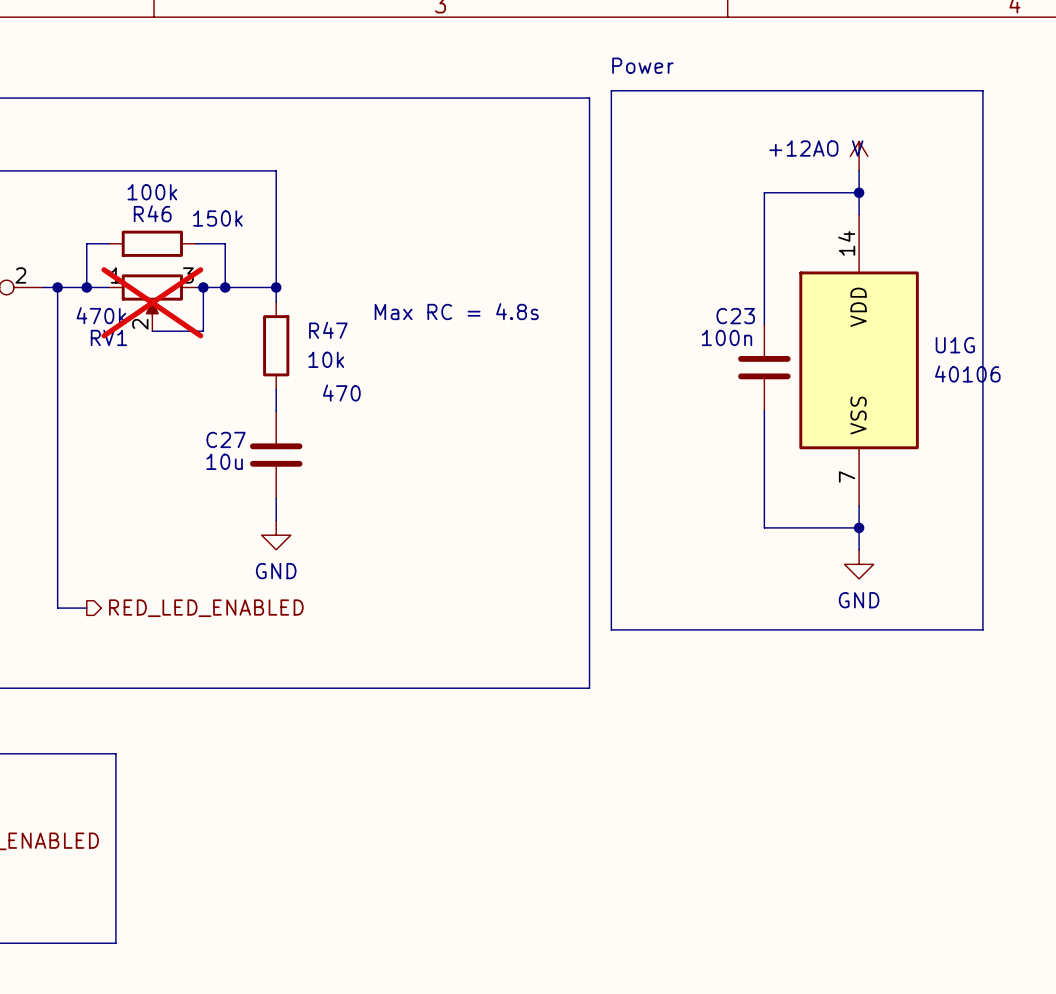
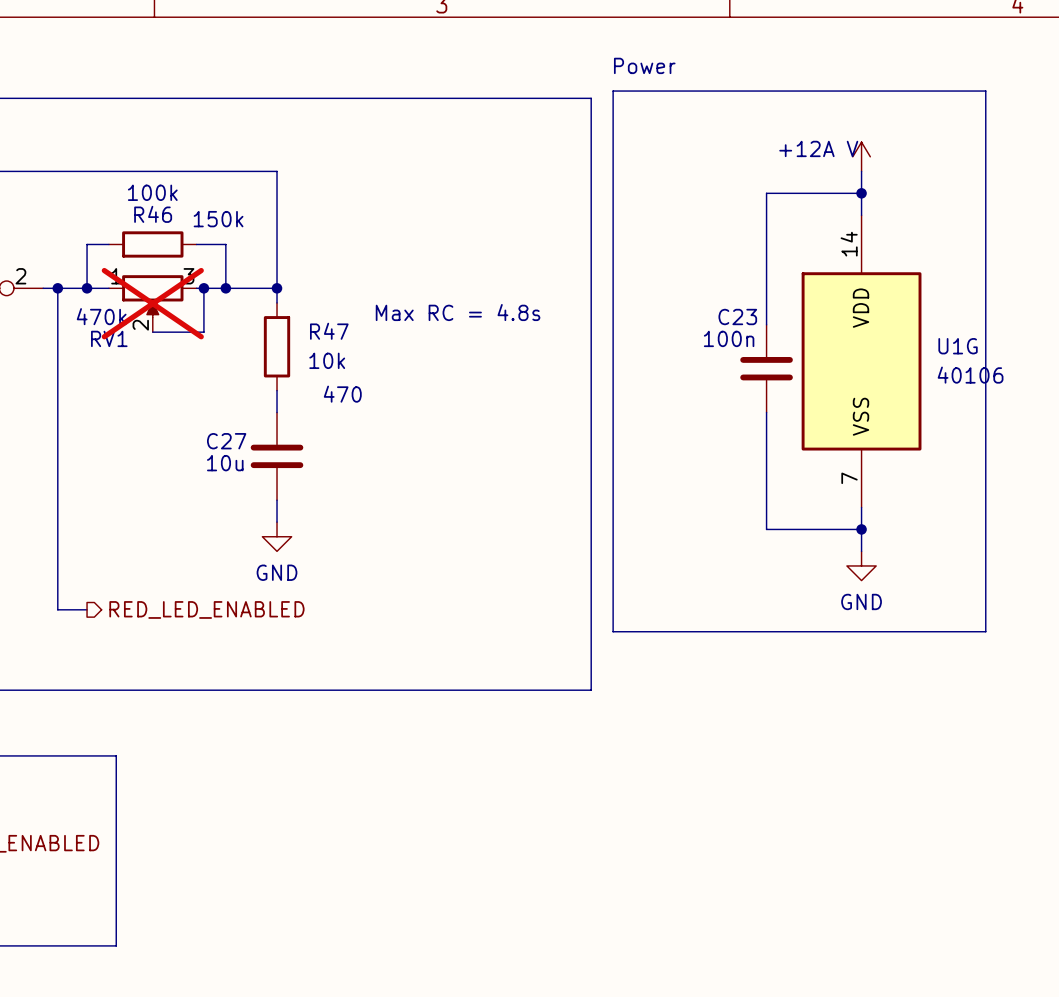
power symbol: +12AO V (859, 156) -> +12A V (861, 156)

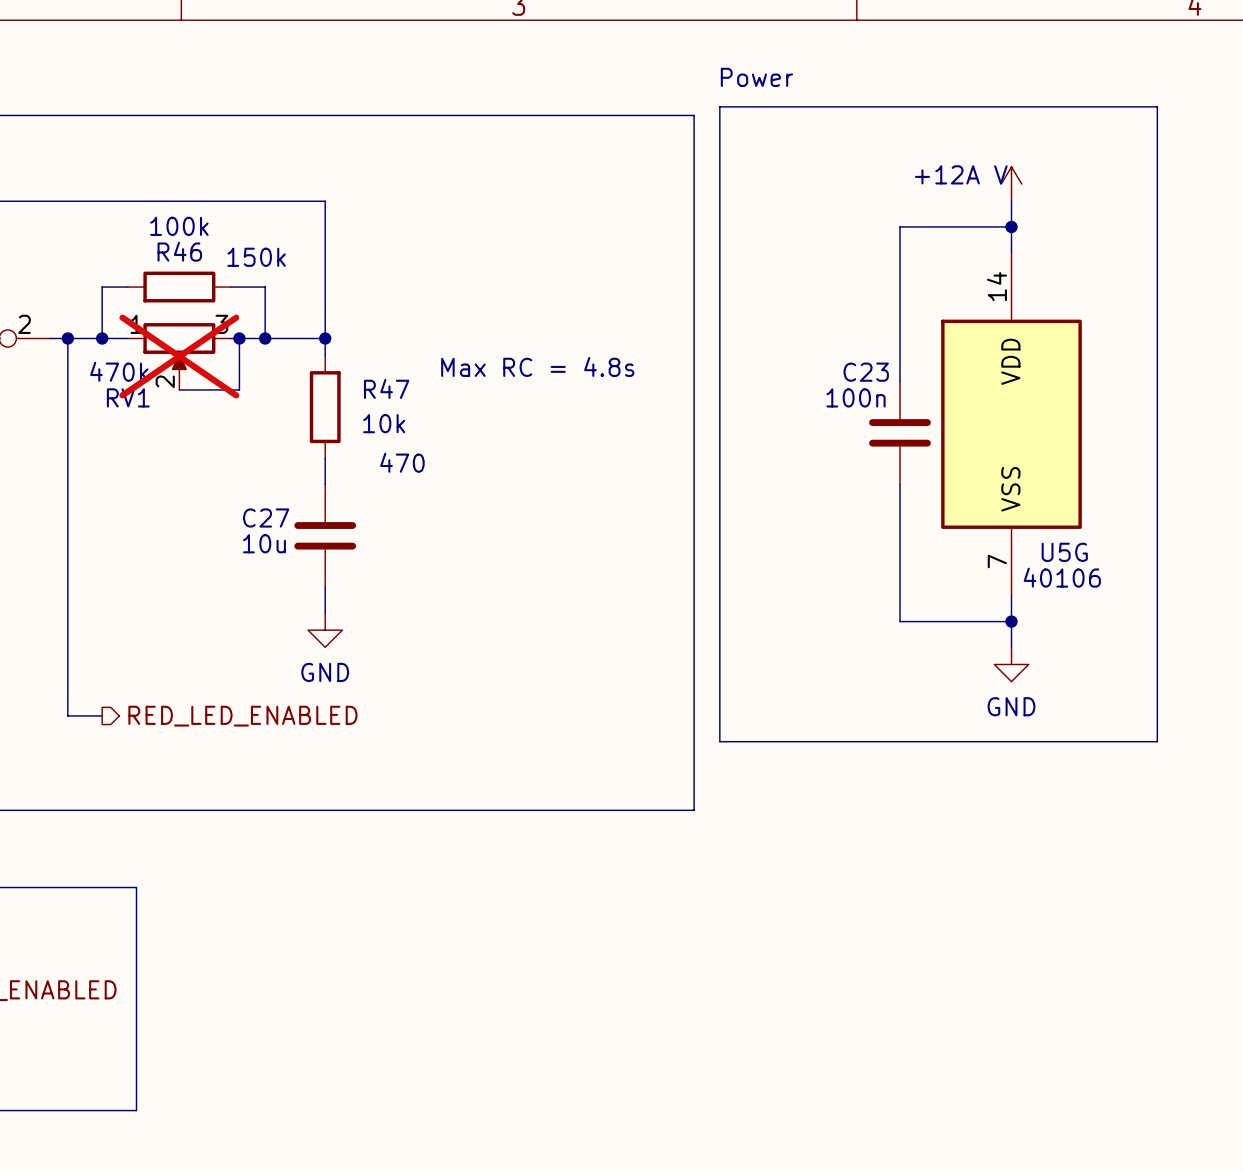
U1G name: U1G (958, 346) -> U5G (1064, 552)
U1G value position: 40106 (970, 375) -> 40106 (1062, 577)

